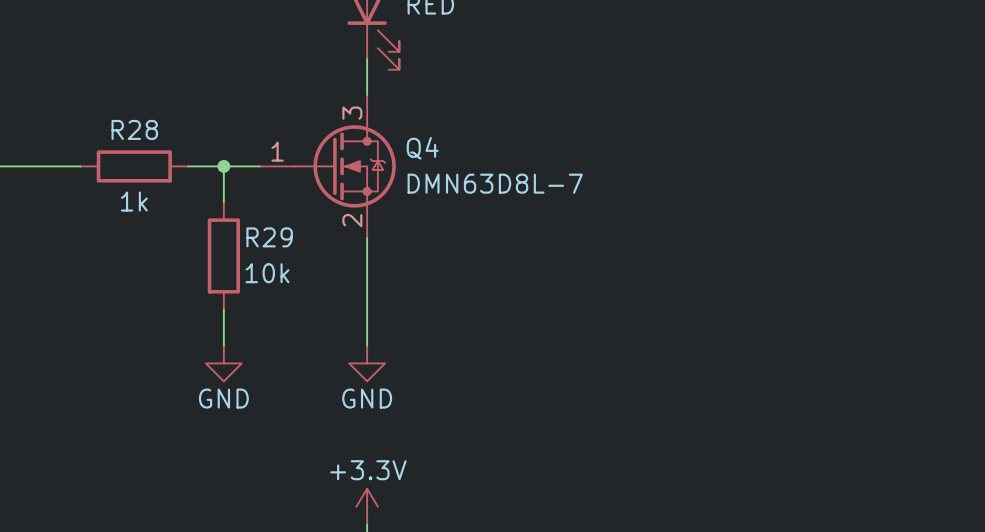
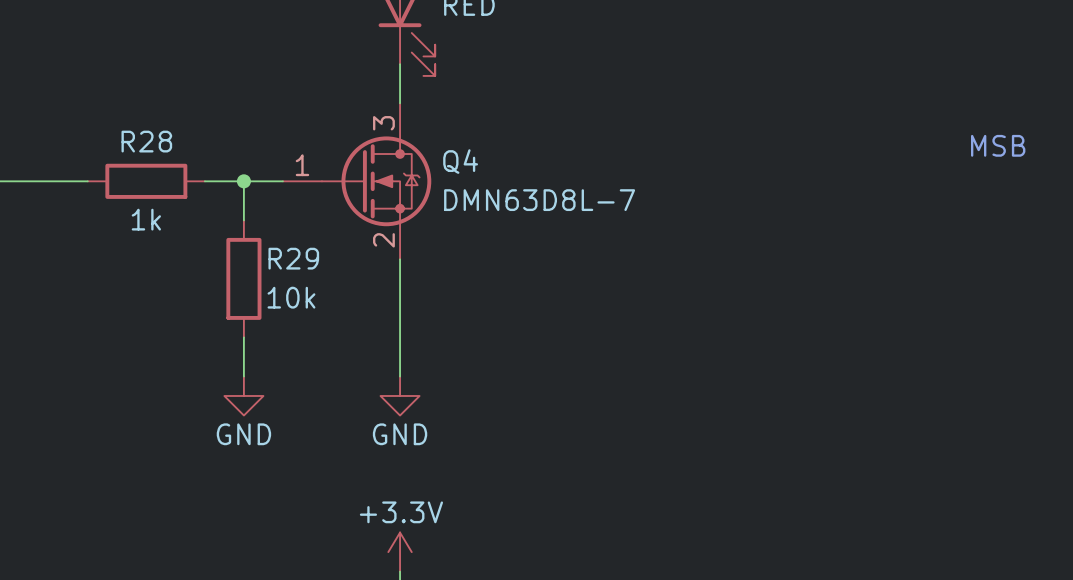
text: none -> MSB (998, 145)

